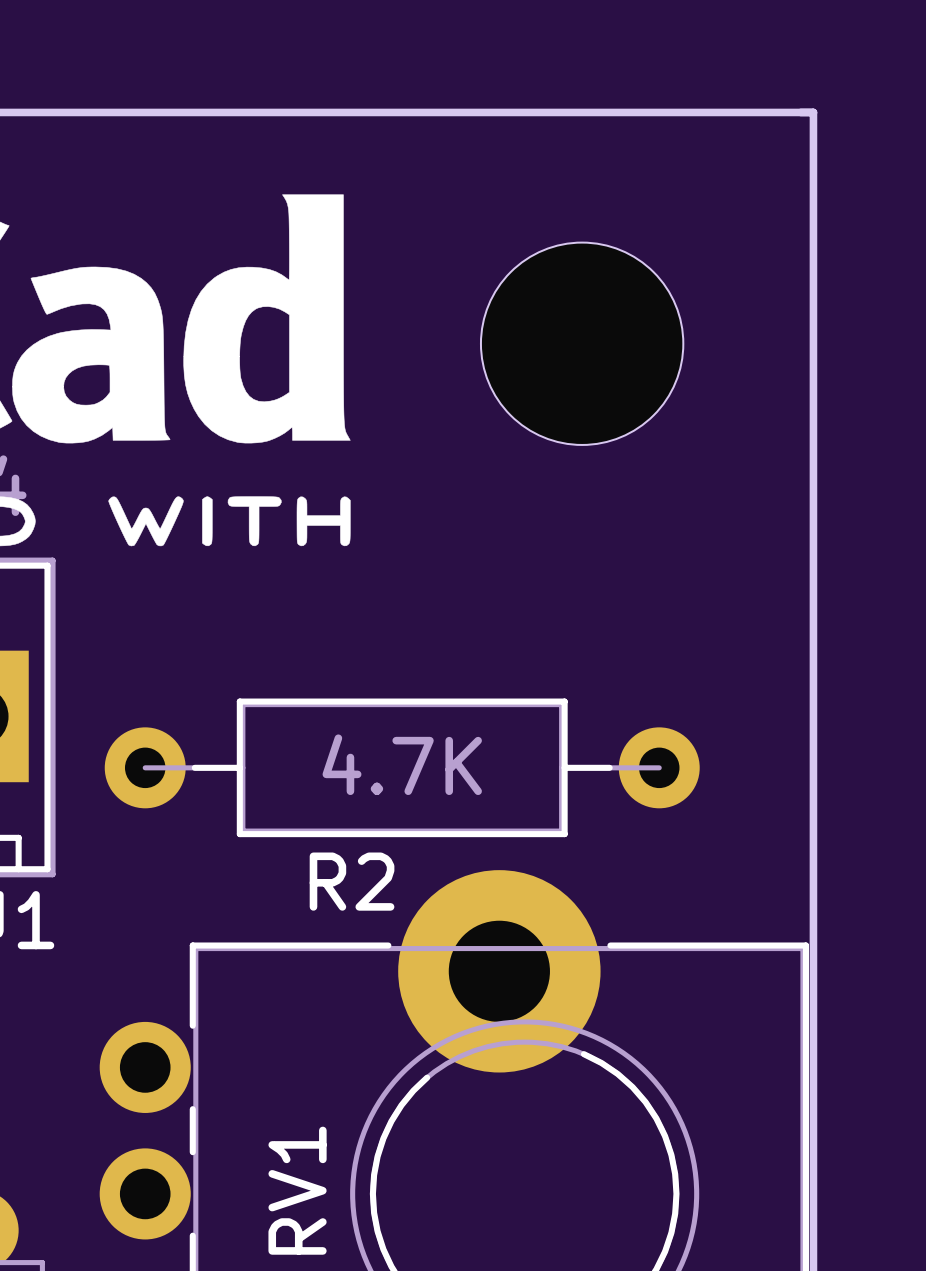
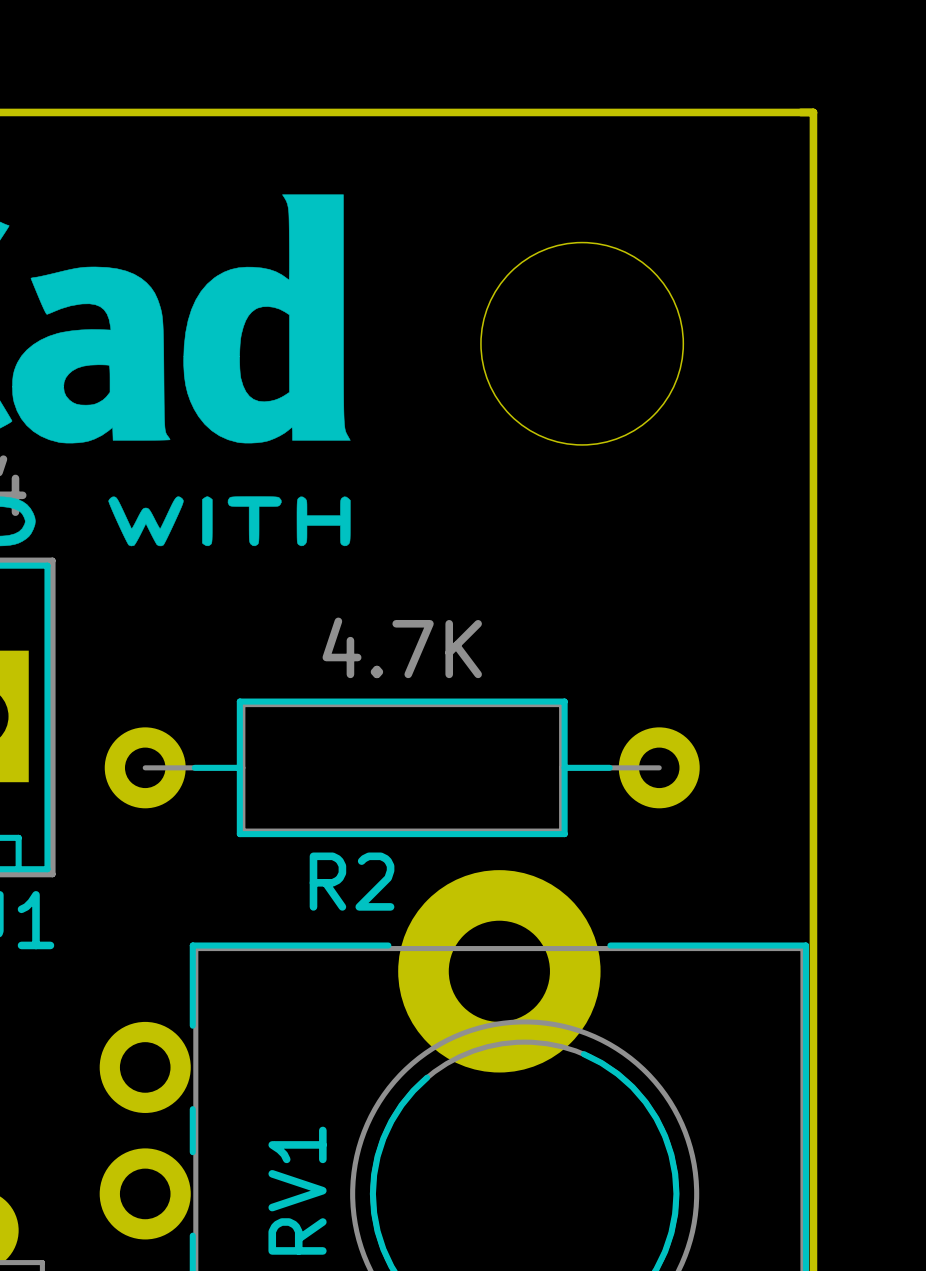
R2 value position: 4.7K (402, 764) -> 4.7K (402, 647)

